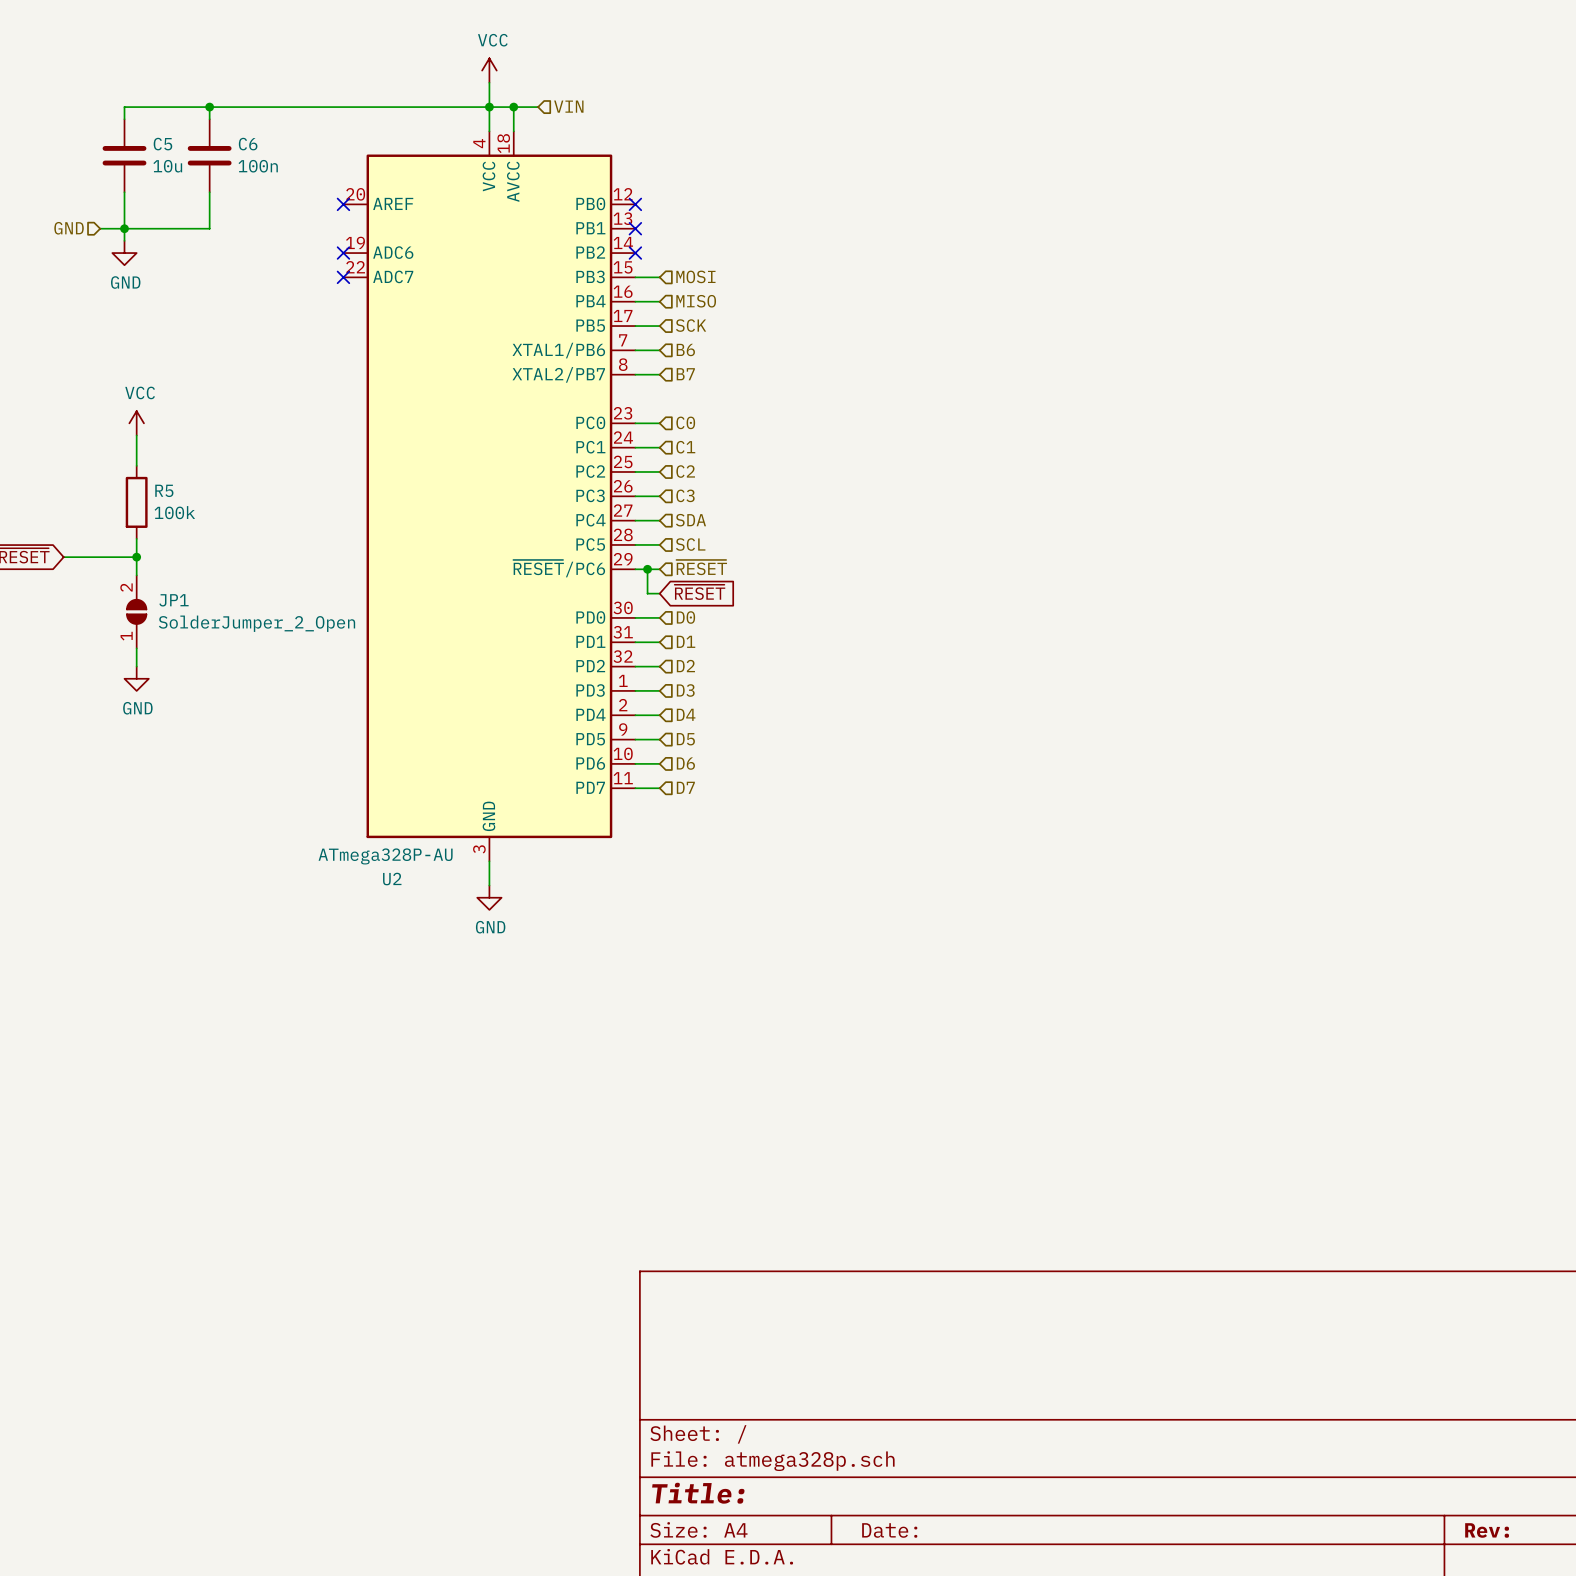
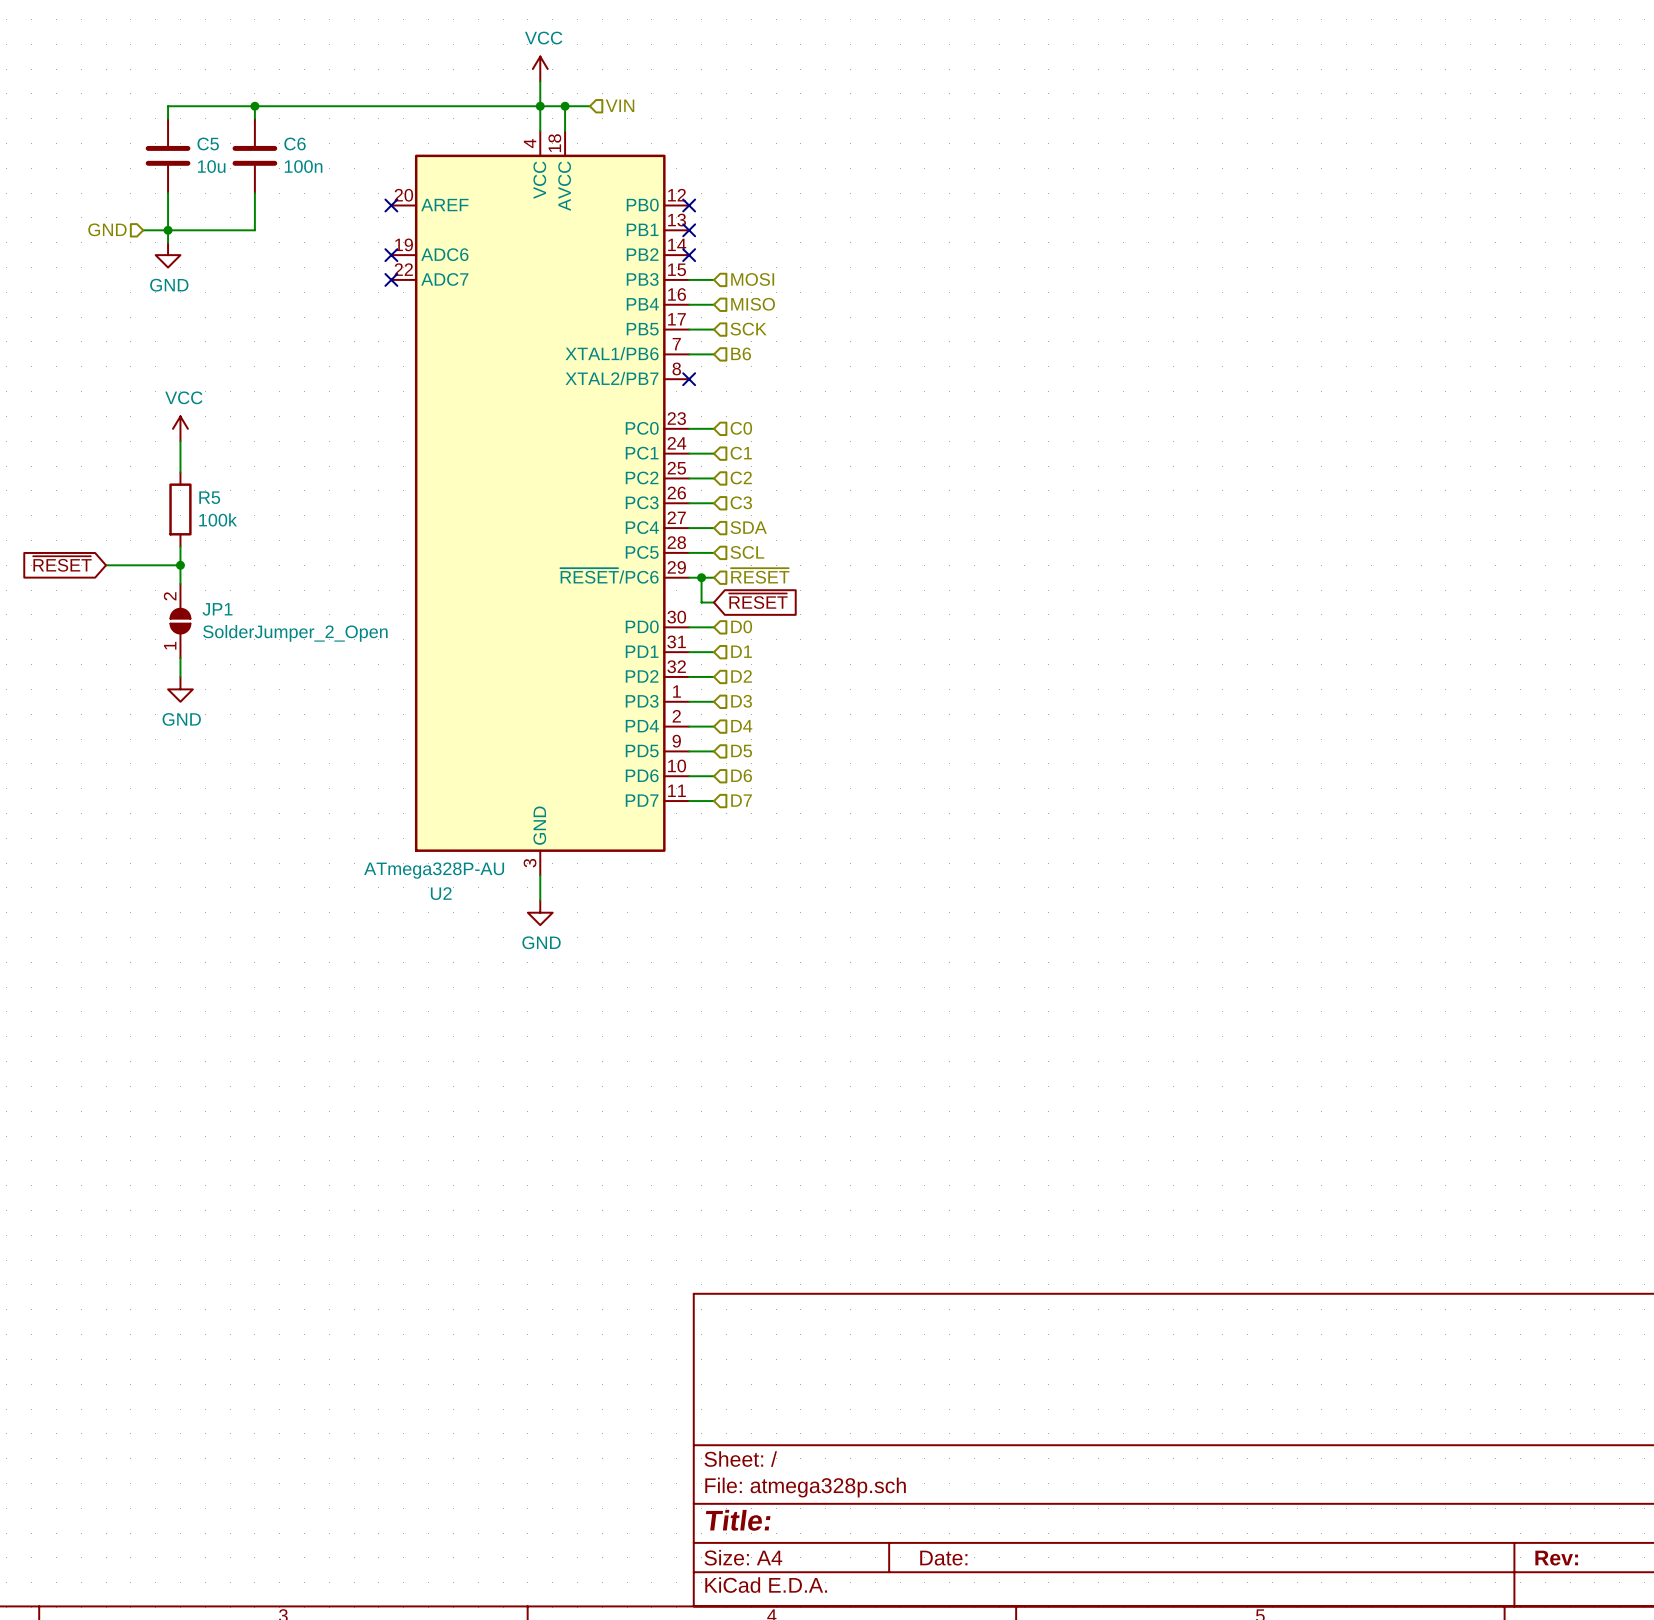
wire: (635, 374) (659, 374) -> none
no-connect mark: none -> (689, 379)
hierarchical label: B7 (685, 374) -> none

